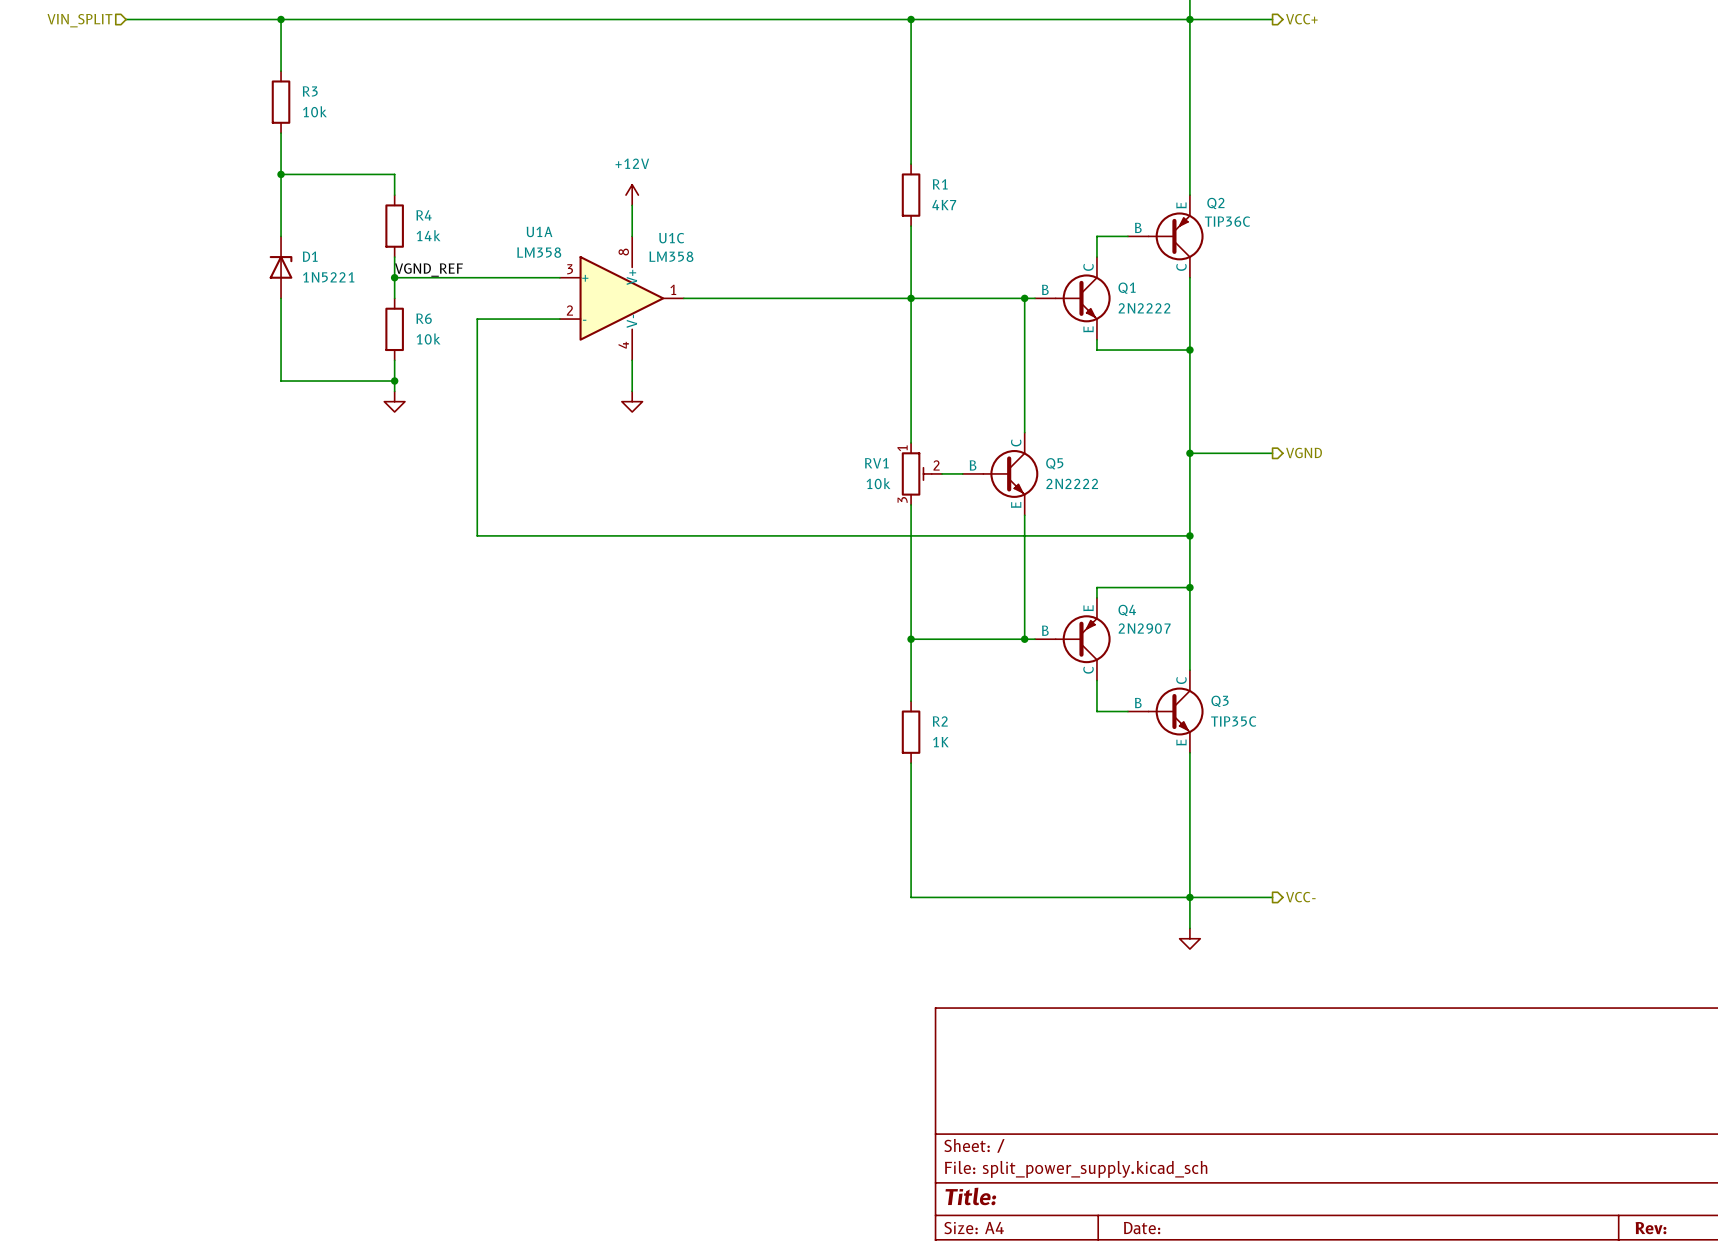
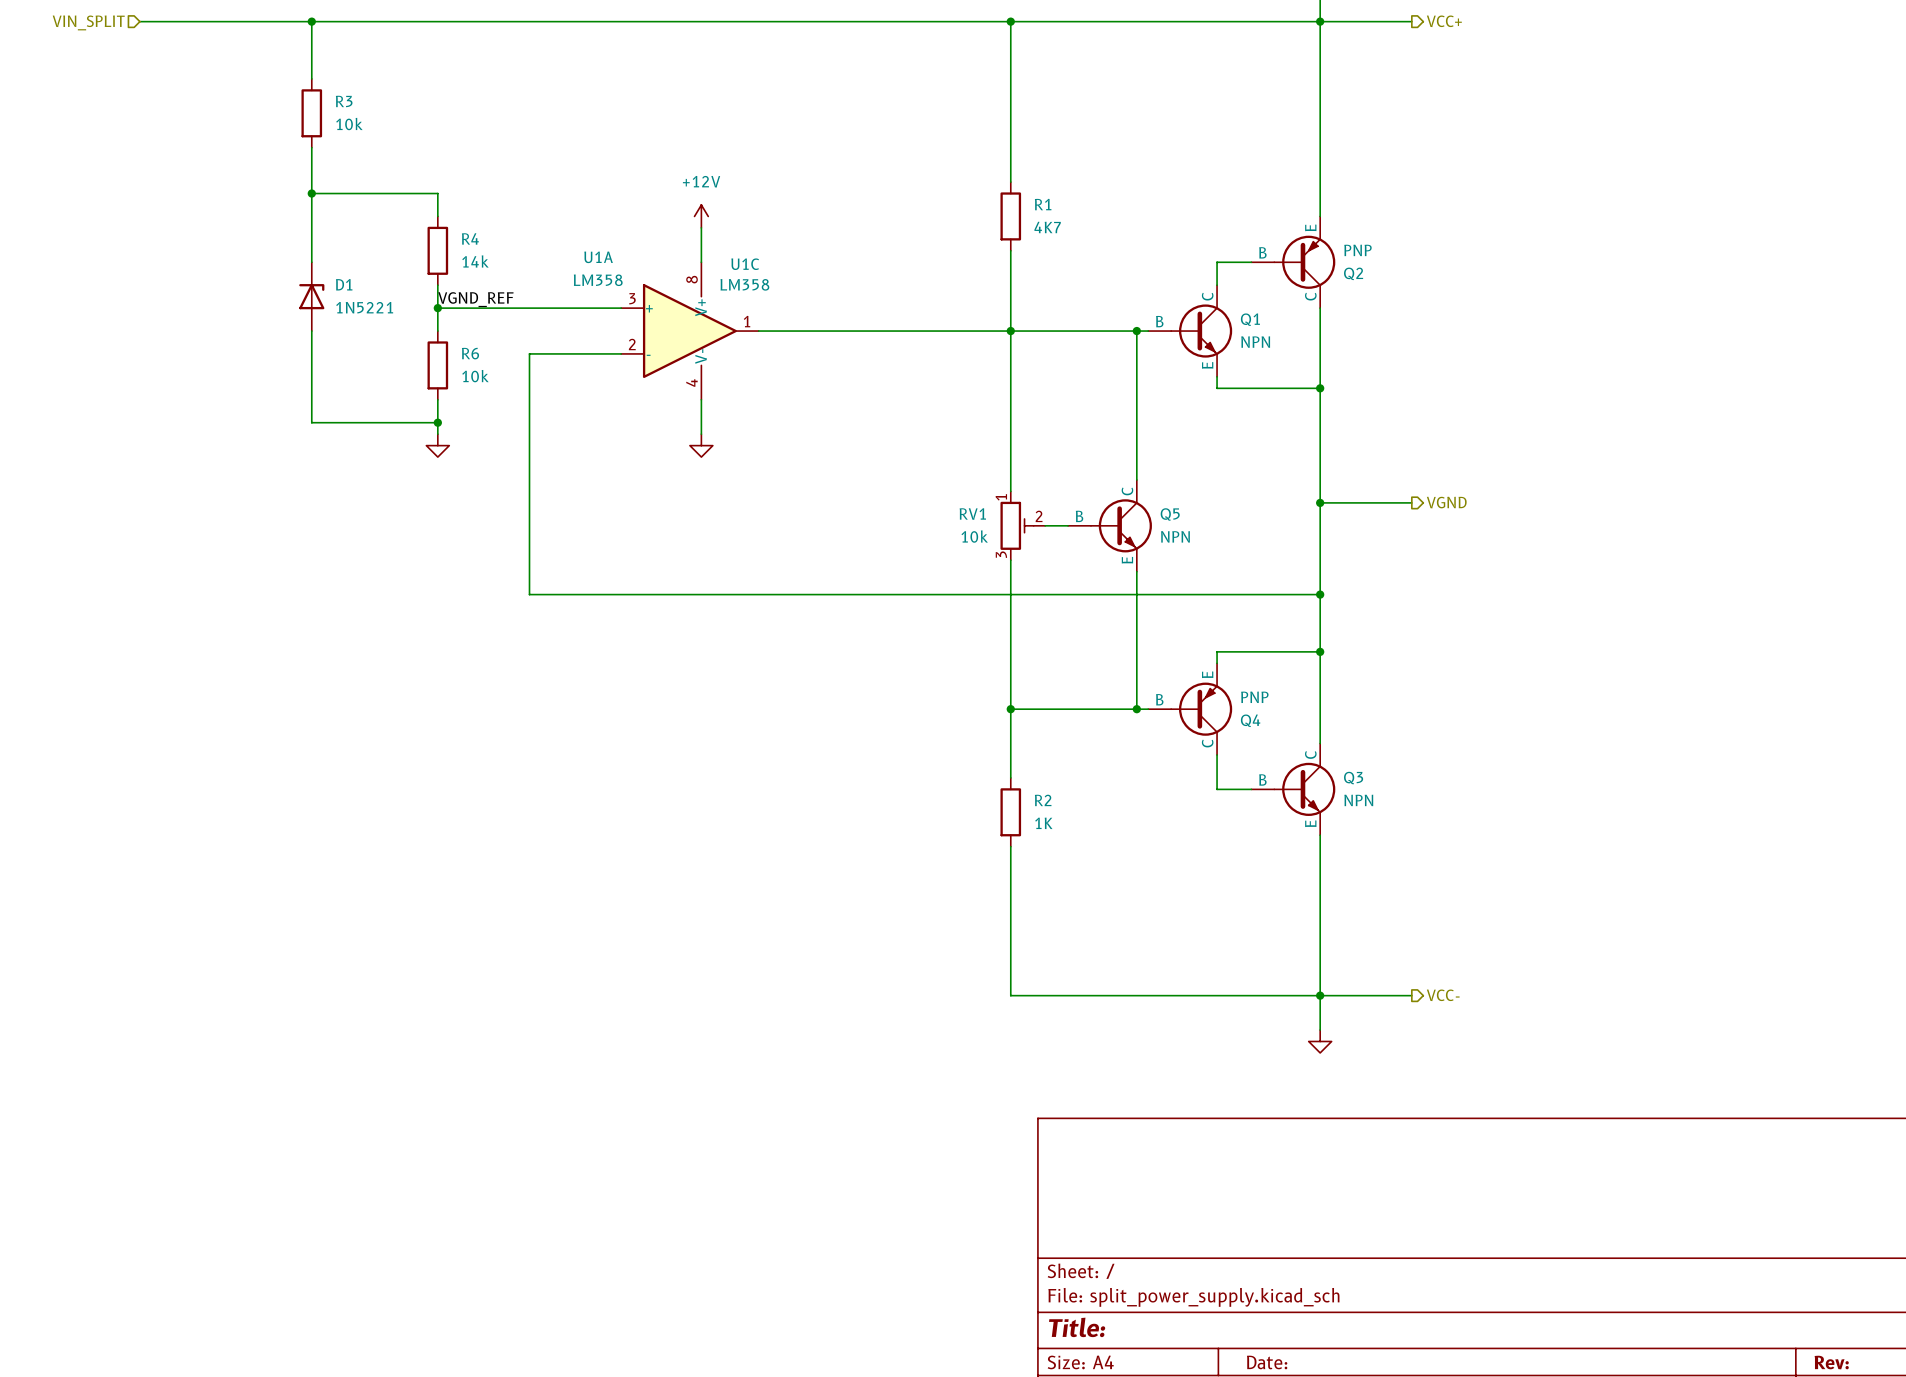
Q2 name position: Q2 (1215, 203) -> Q2 (1353, 273)
Q2 value: TIP36C (1227, 221) -> PNP (1357, 250)
Q1 value: 2N2222 (1144, 308) -> NPN (1255, 342)
Q5 value: 2N2222 (1072, 483) -> NPN (1175, 536)
Q4 name position: Q4 (1127, 610) -> Q4 (1250, 720)
Q4 value: 2N2907 (1144, 628) -> PNP (1254, 697)
Q3 value: TIP35C (1233, 721) -> NPN (1358, 800)

